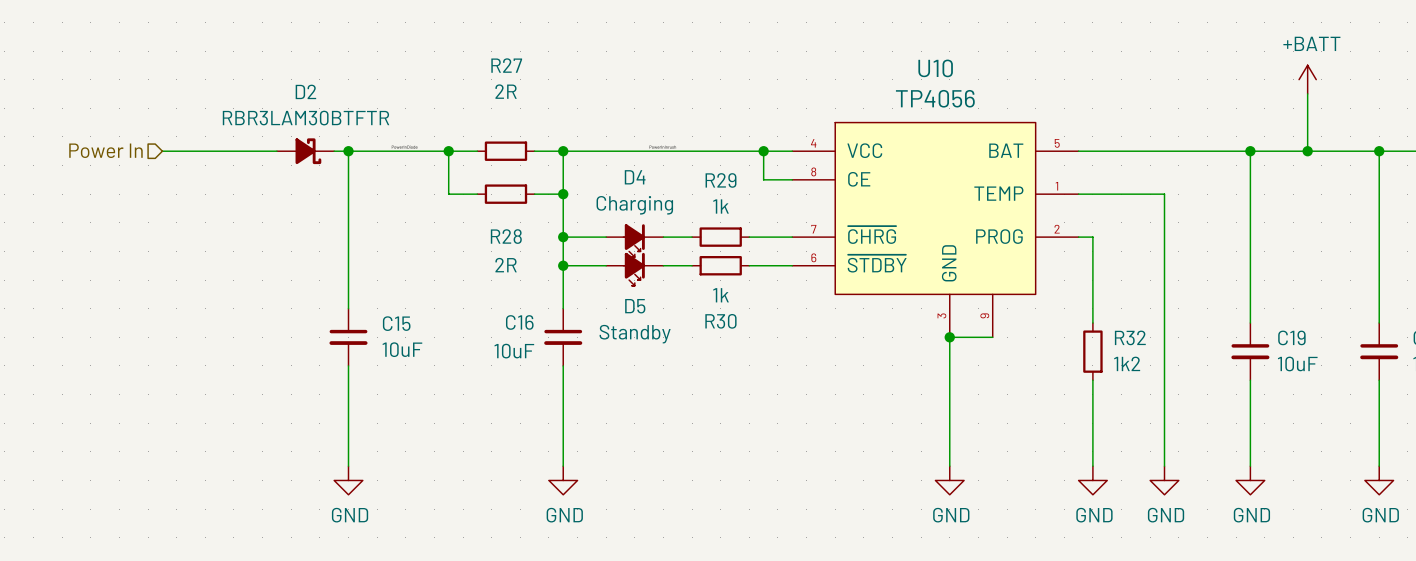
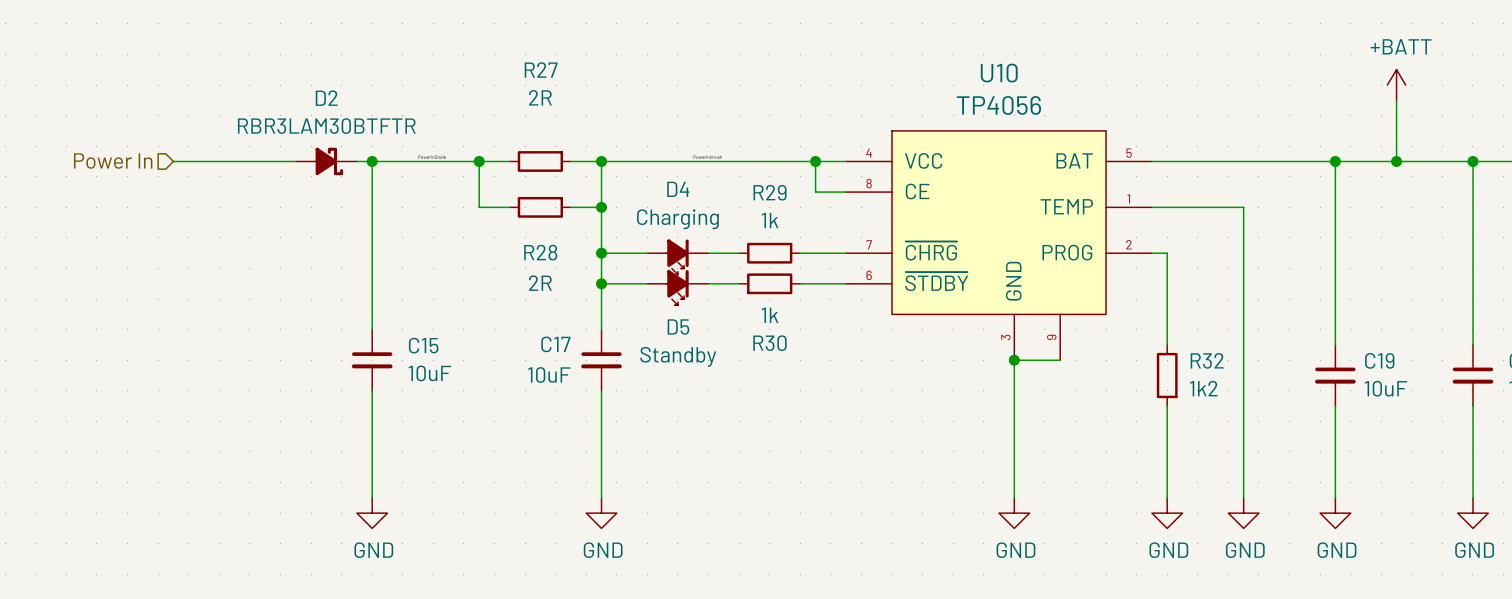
C16 name: C16 (519, 322) -> C17 (555, 344)

